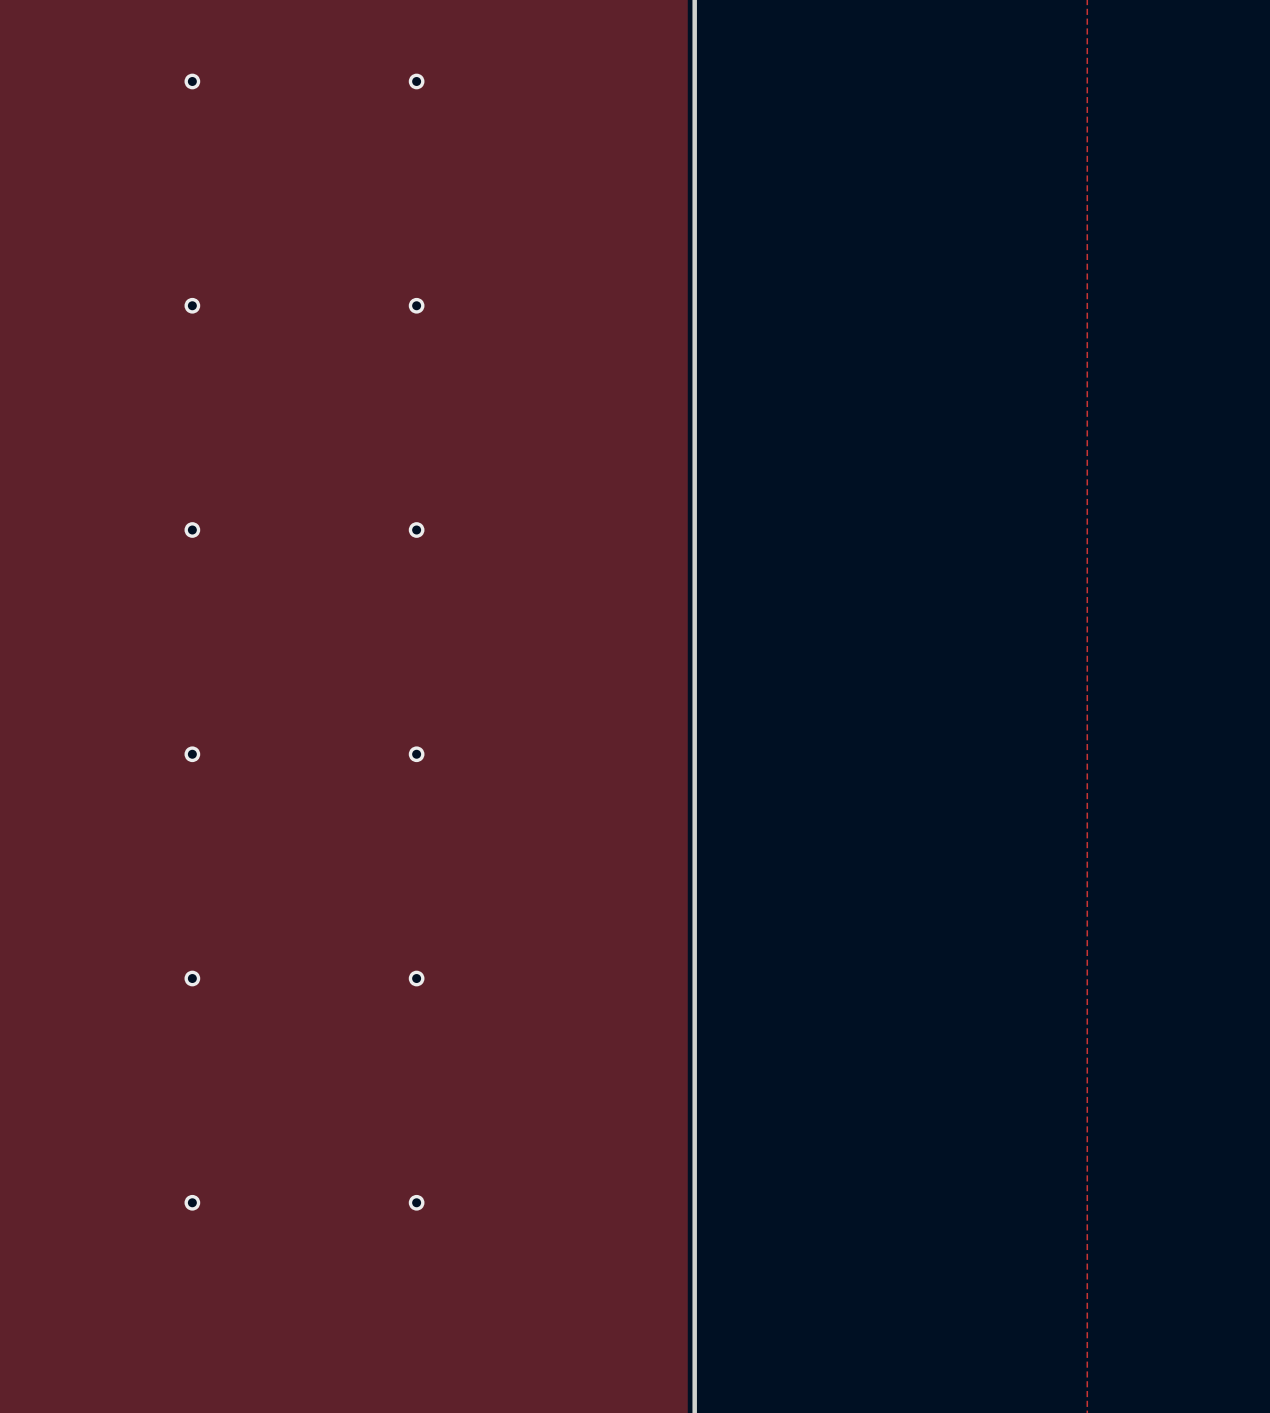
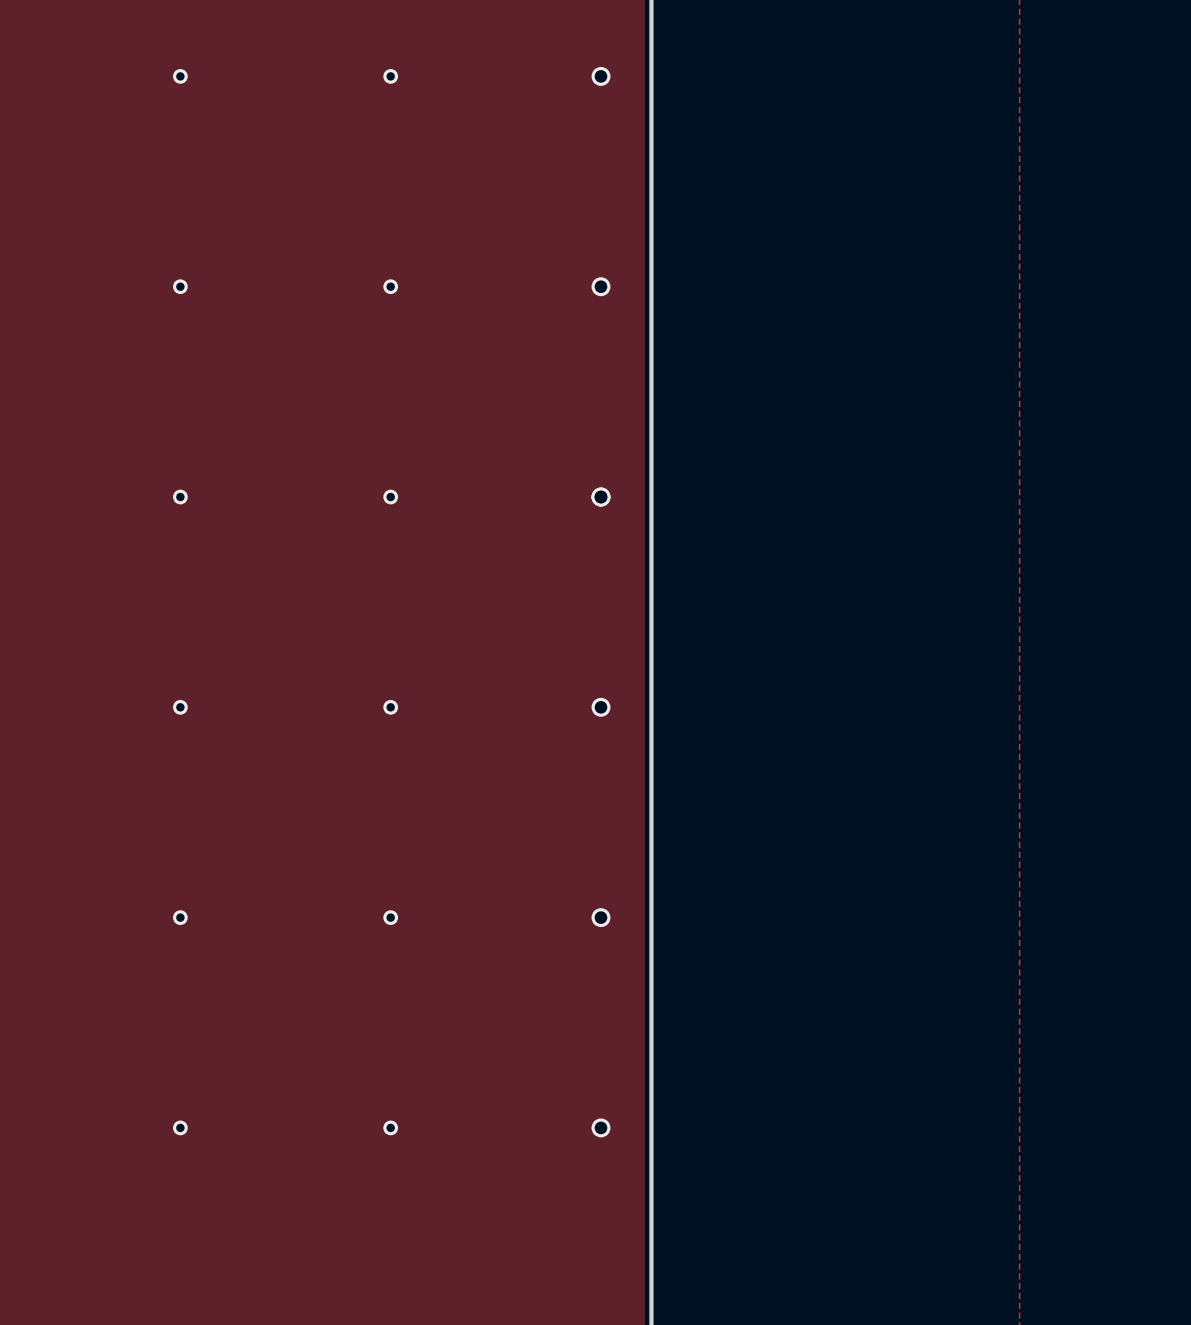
via: none -> (600, 76)
via: none -> (600, 286)
via: none -> (600, 497)
via: none -> (600, 707)
via: none -> (600, 917)
via: none -> (600, 1127)

